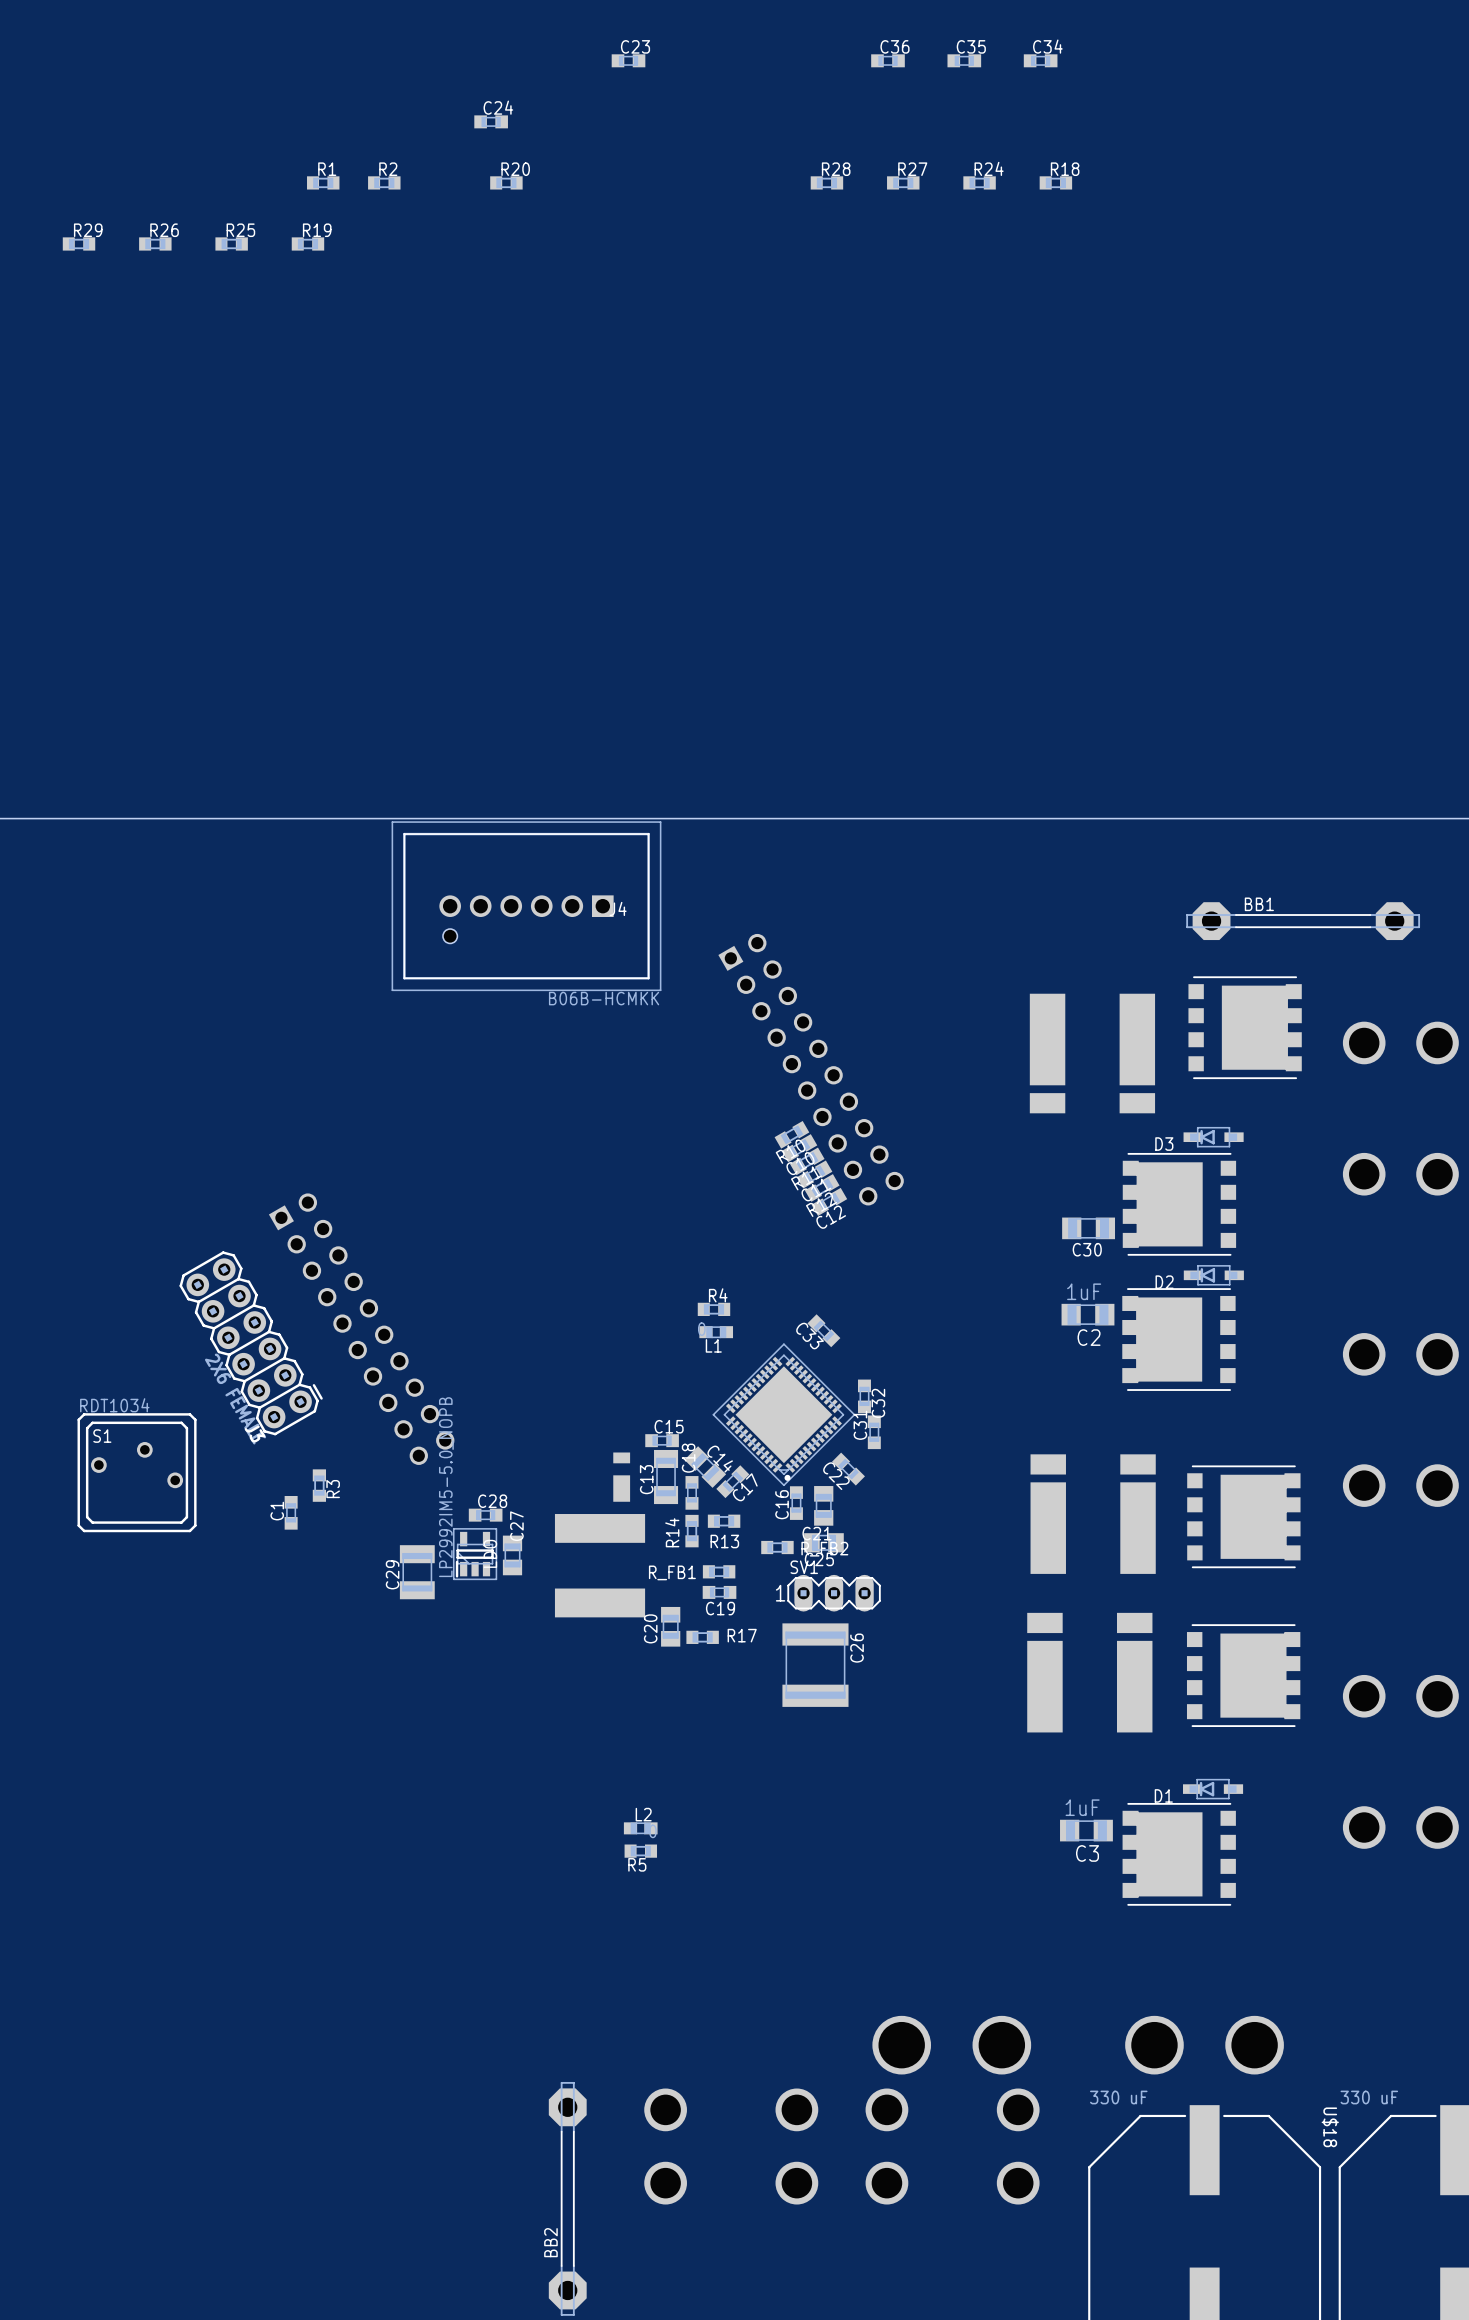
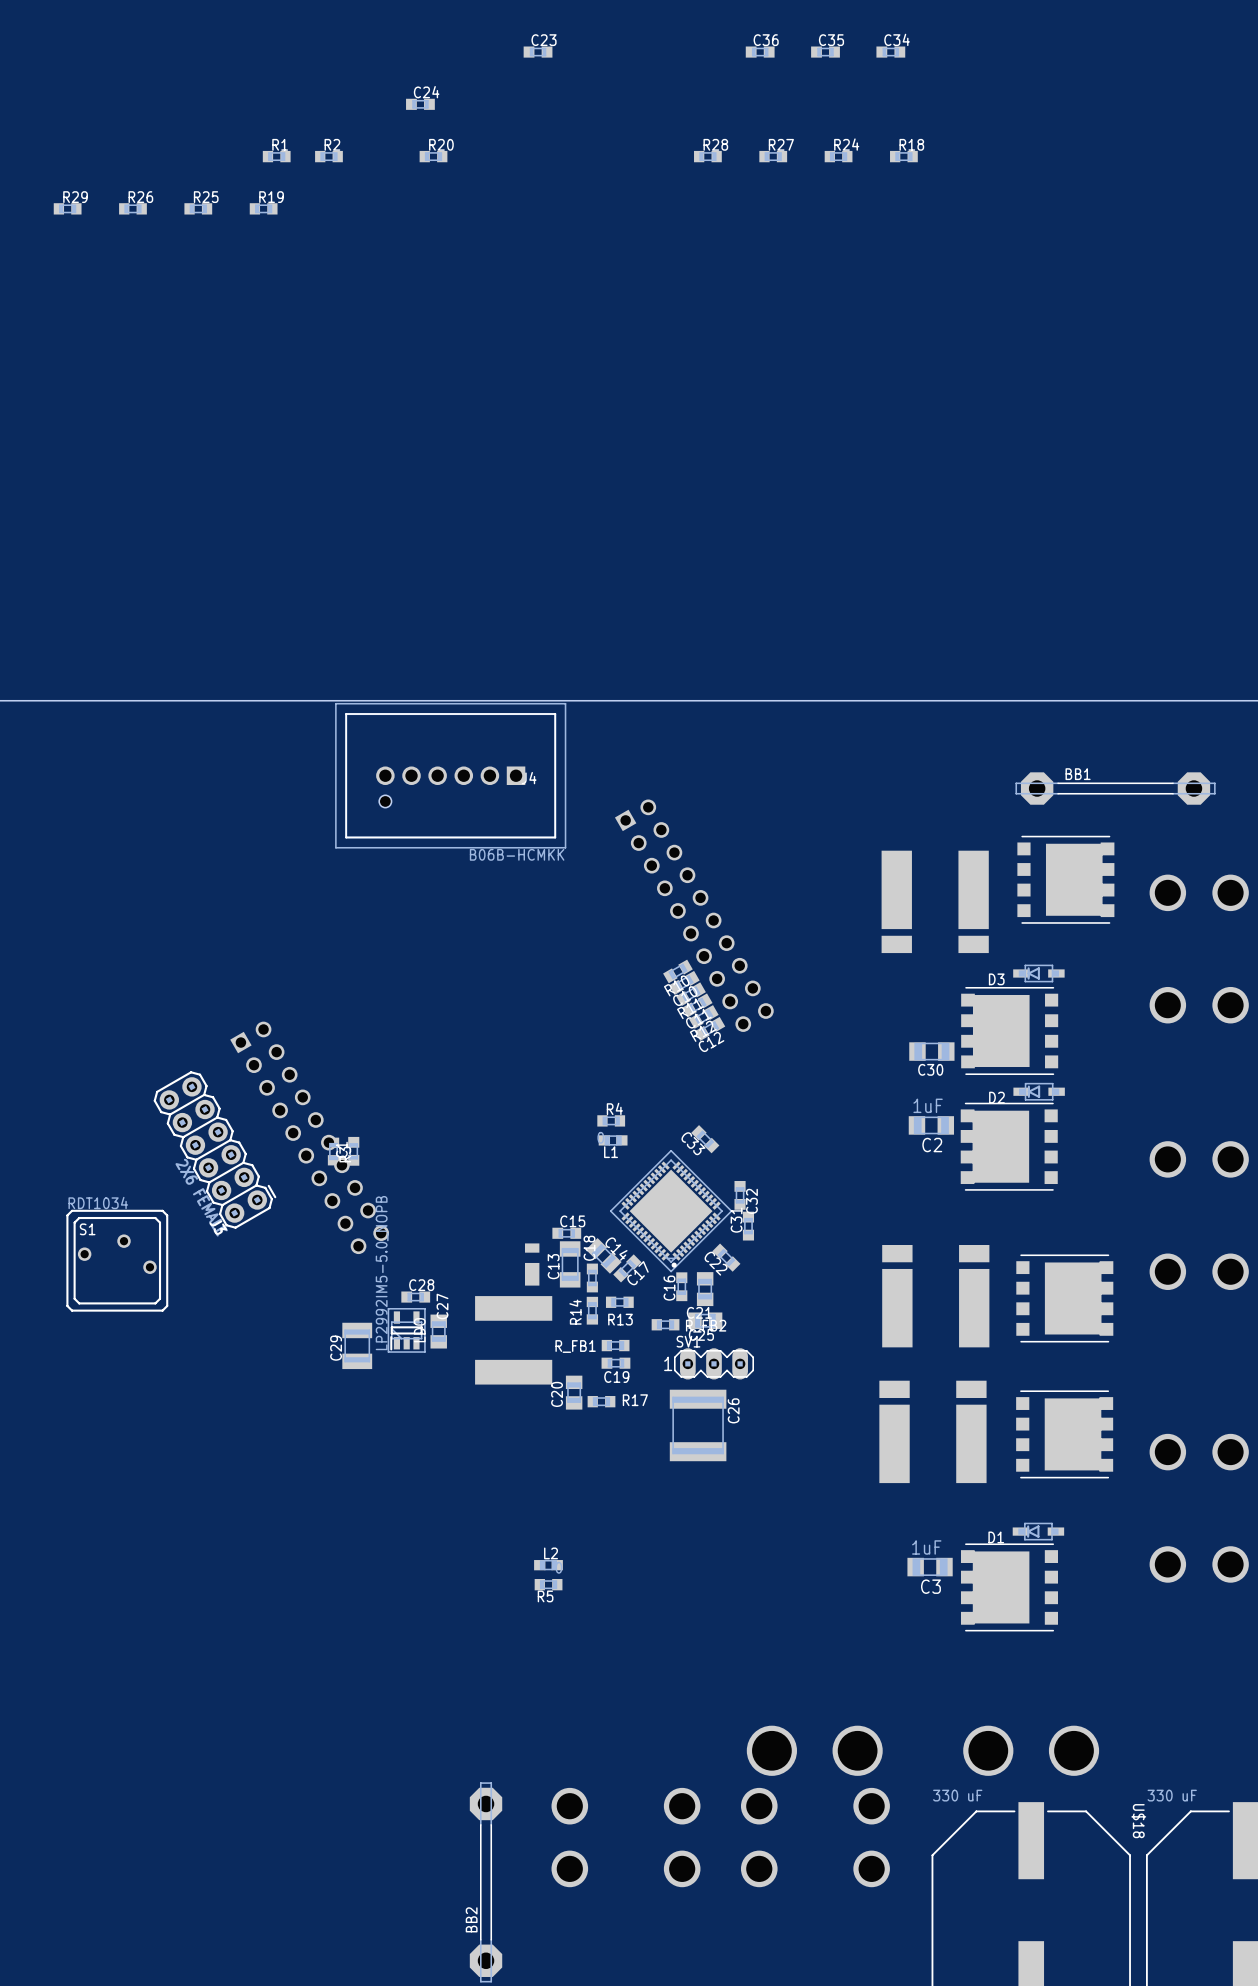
R3 position: (319, 1485) -> (333, 1151)
C1 position: (291, 1512) -> (353, 1151)

